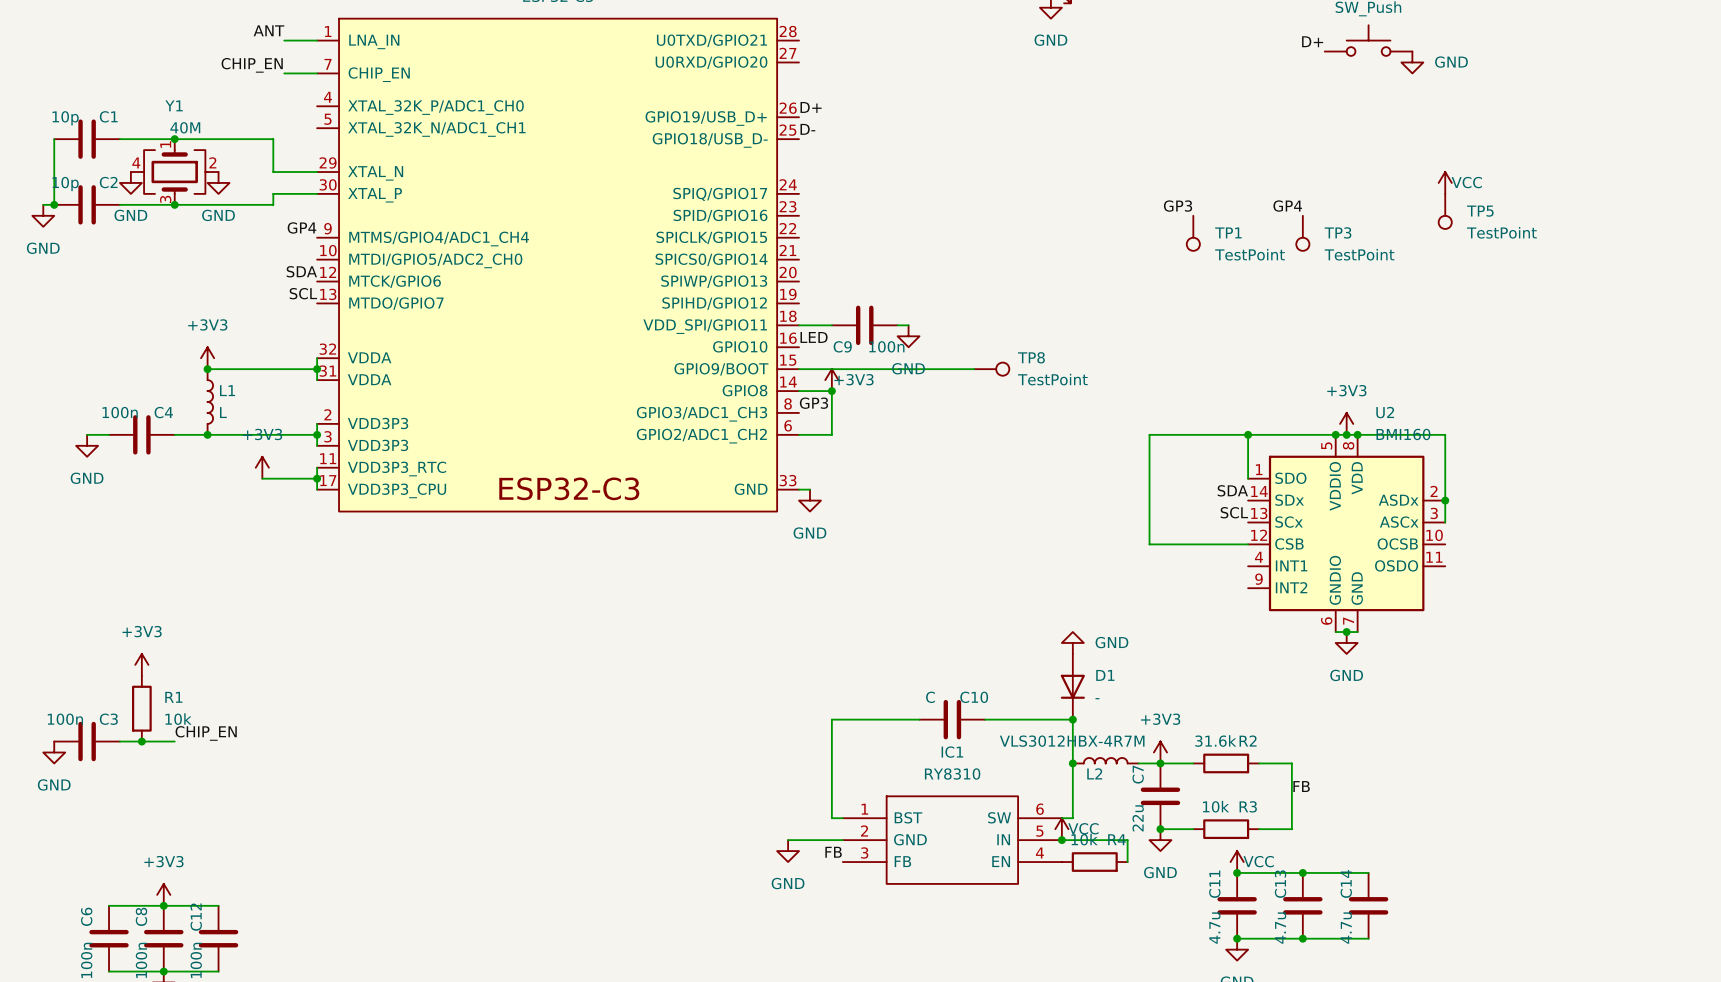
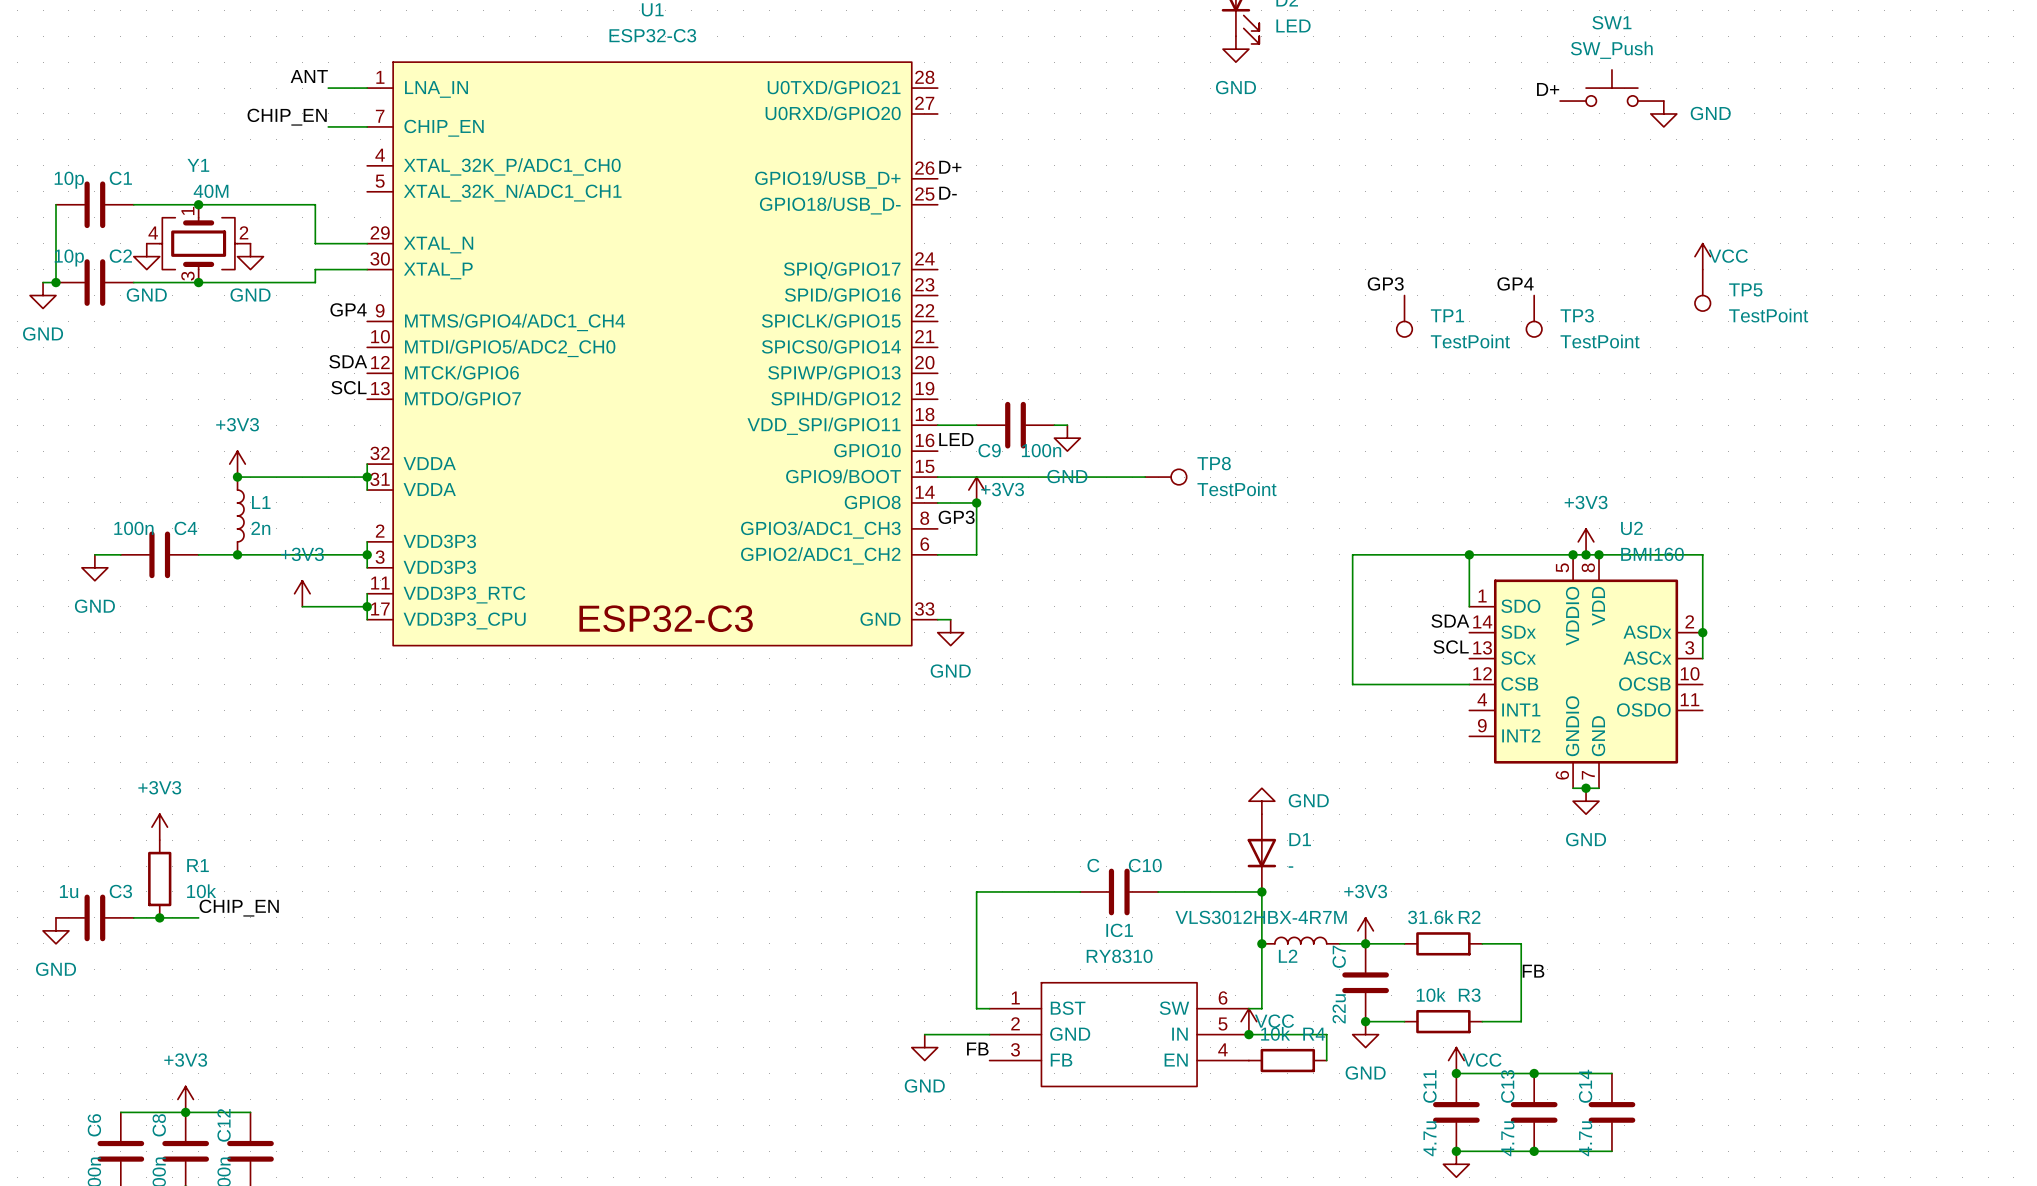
L1 value: L (223, 412) -> 2n (260, 528)
C3 value: 100n (65, 719) -> 1u (69, 891)

